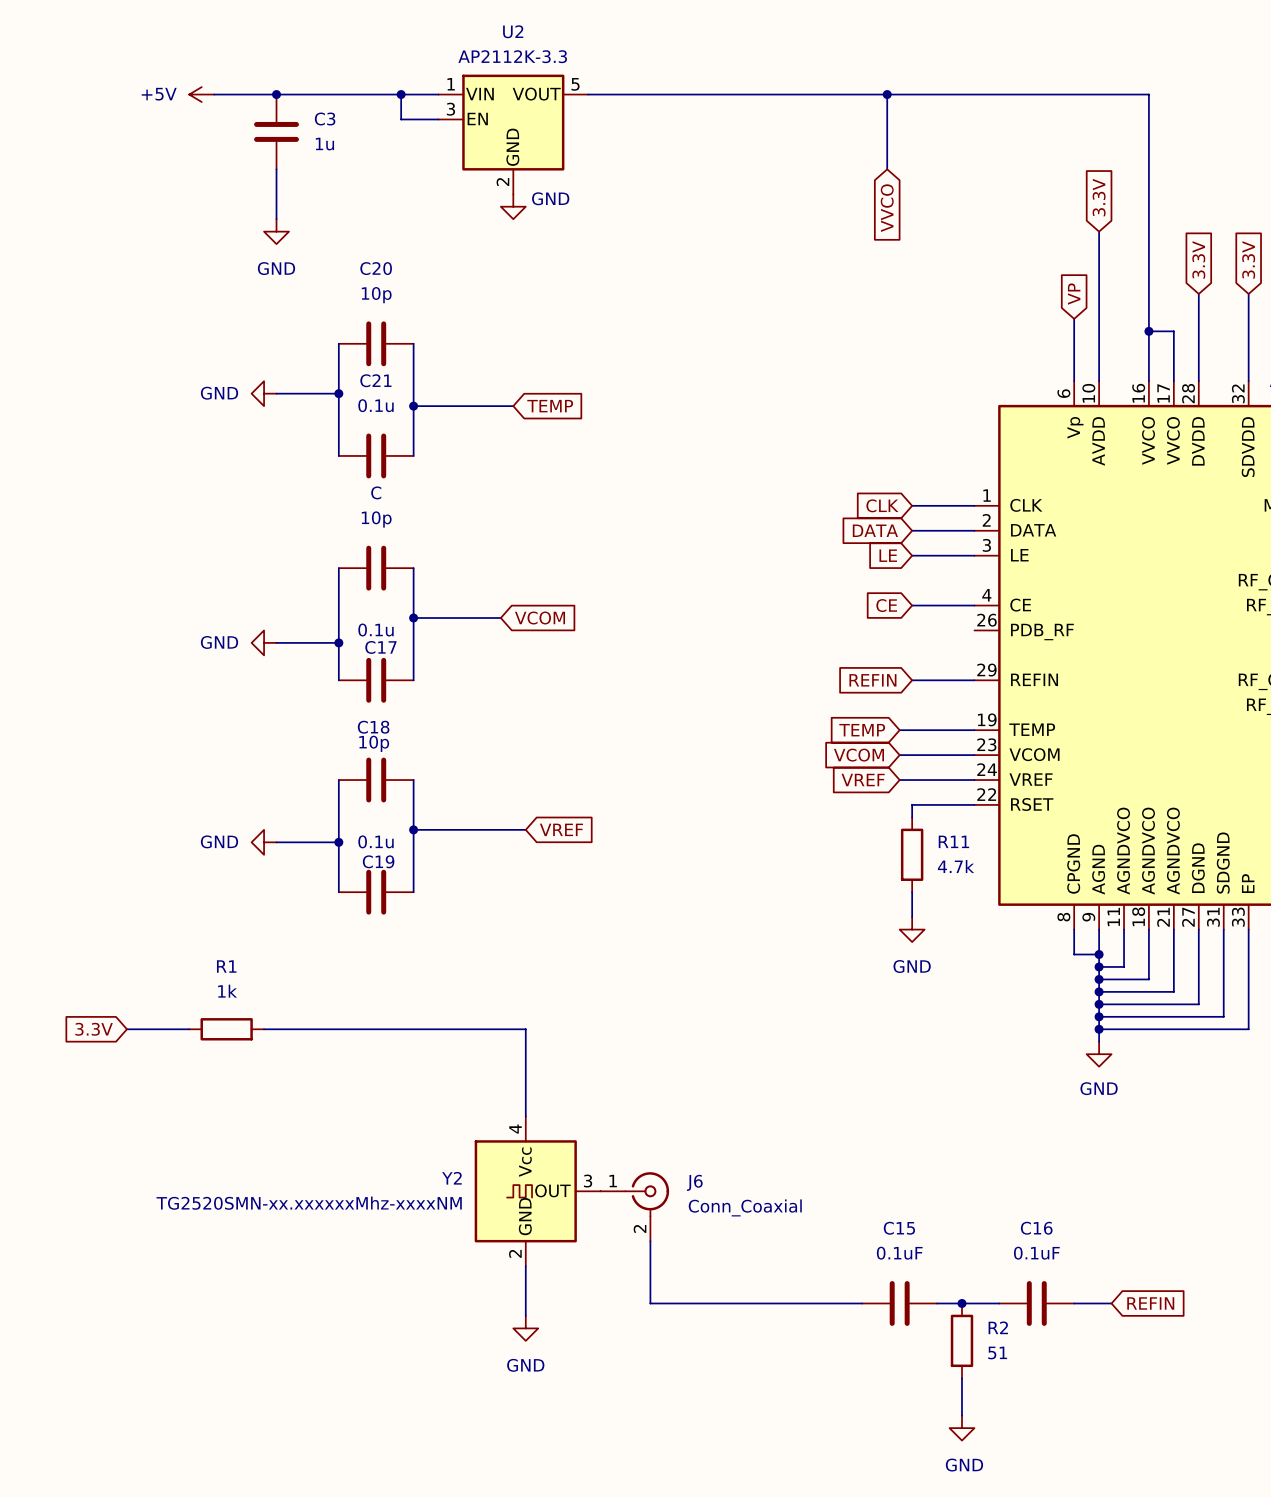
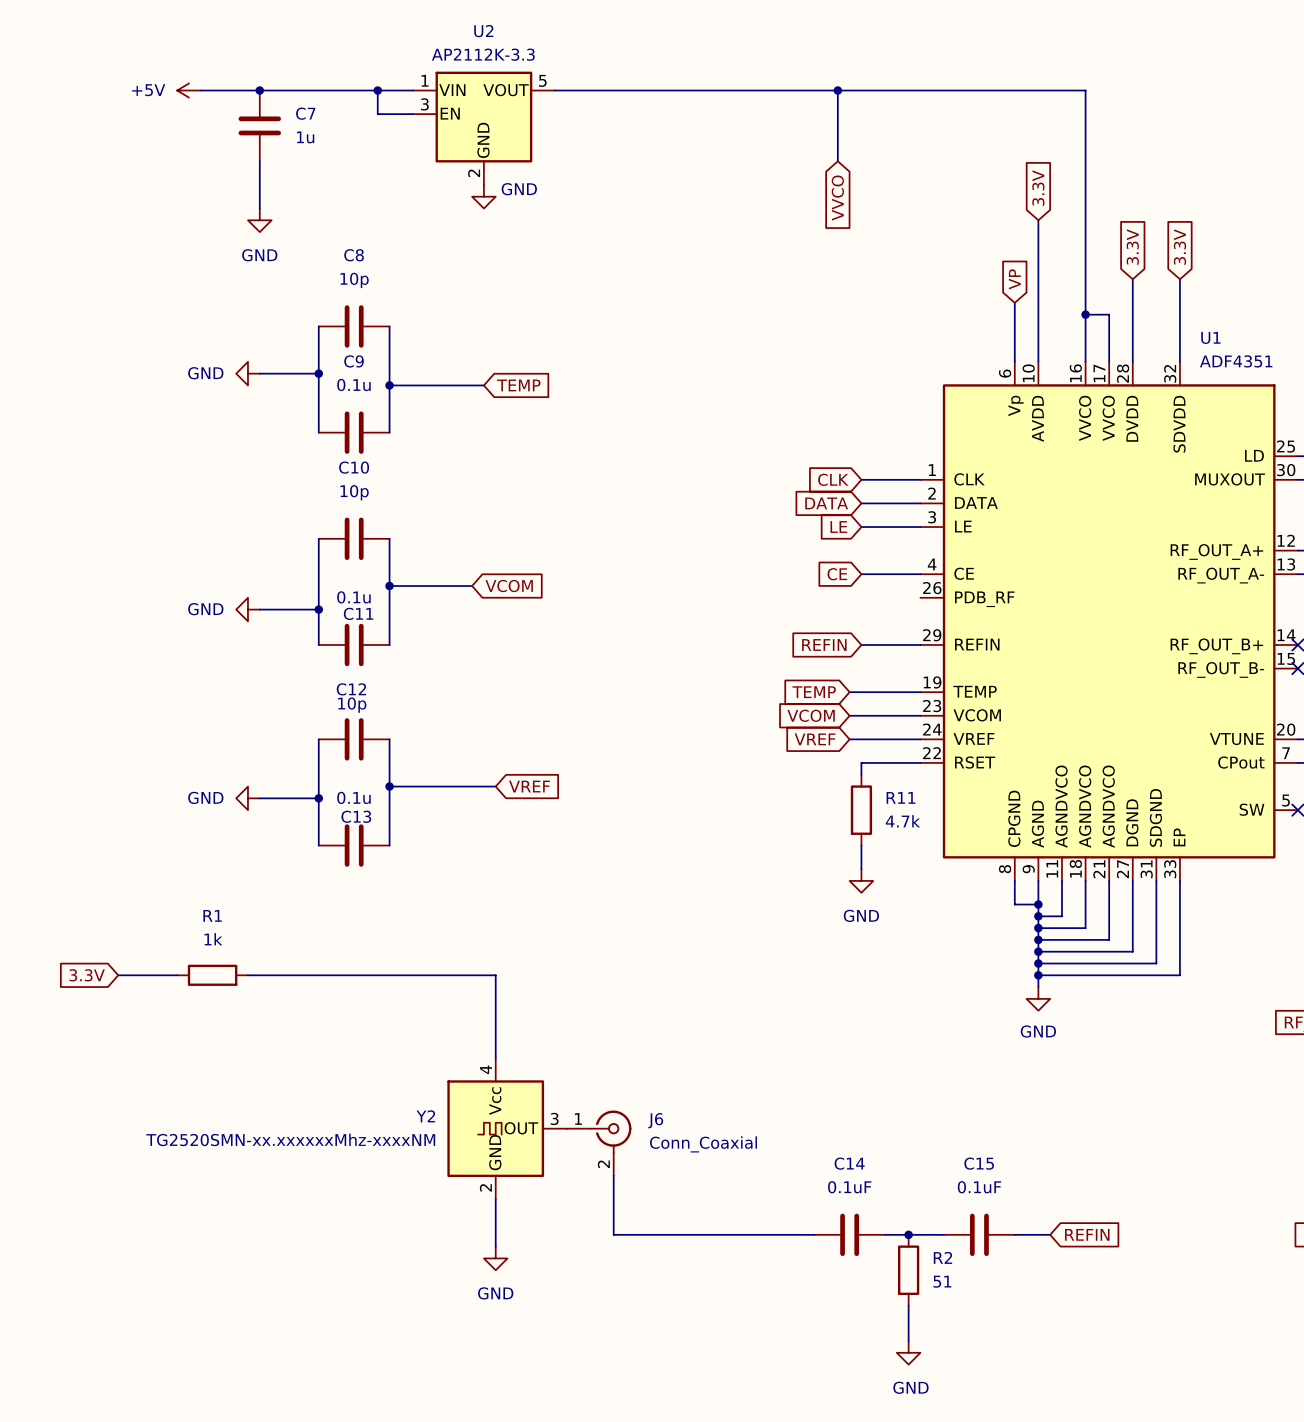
C3 name: C3 (325, 119) -> C7 (305, 113)
C20 name: C20 (376, 268) -> C8 (354, 255)
C21 name: C21 (375, 380) -> C9 (354, 361)
C name: C (376, 492) -> C10 (354, 467)
C17 name: C17 (380, 647) -> C11 (358, 613)
C18 name: C18 (373, 727) -> C12 (351, 689)
C19 name: C19 (378, 861) -> C13 (356, 816)
C15 name: C15 (899, 1228) -> C14 (849, 1163)
C16 name: C16 (1036, 1228) -> C15 (979, 1163)

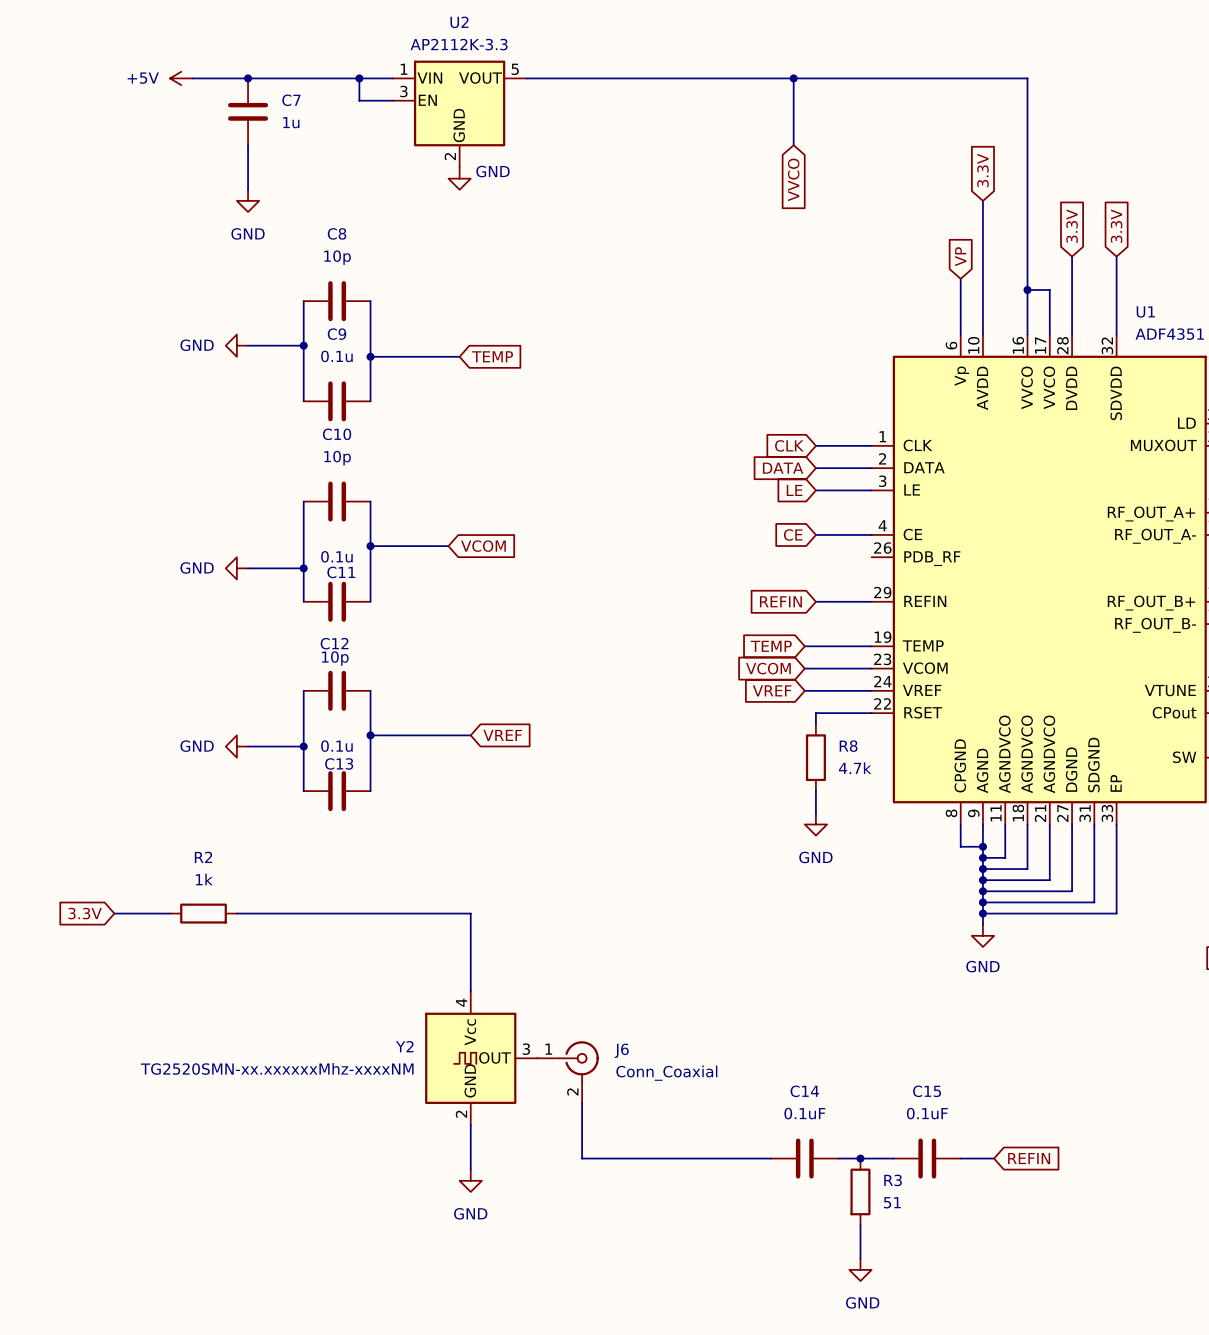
R11 name: R11 (900, 797) -> R8 (848, 746)
R1 name: R1 (212, 915) -> R2 (203, 857)
R2 name: R2 (942, 1257) -> R3 (893, 1180)

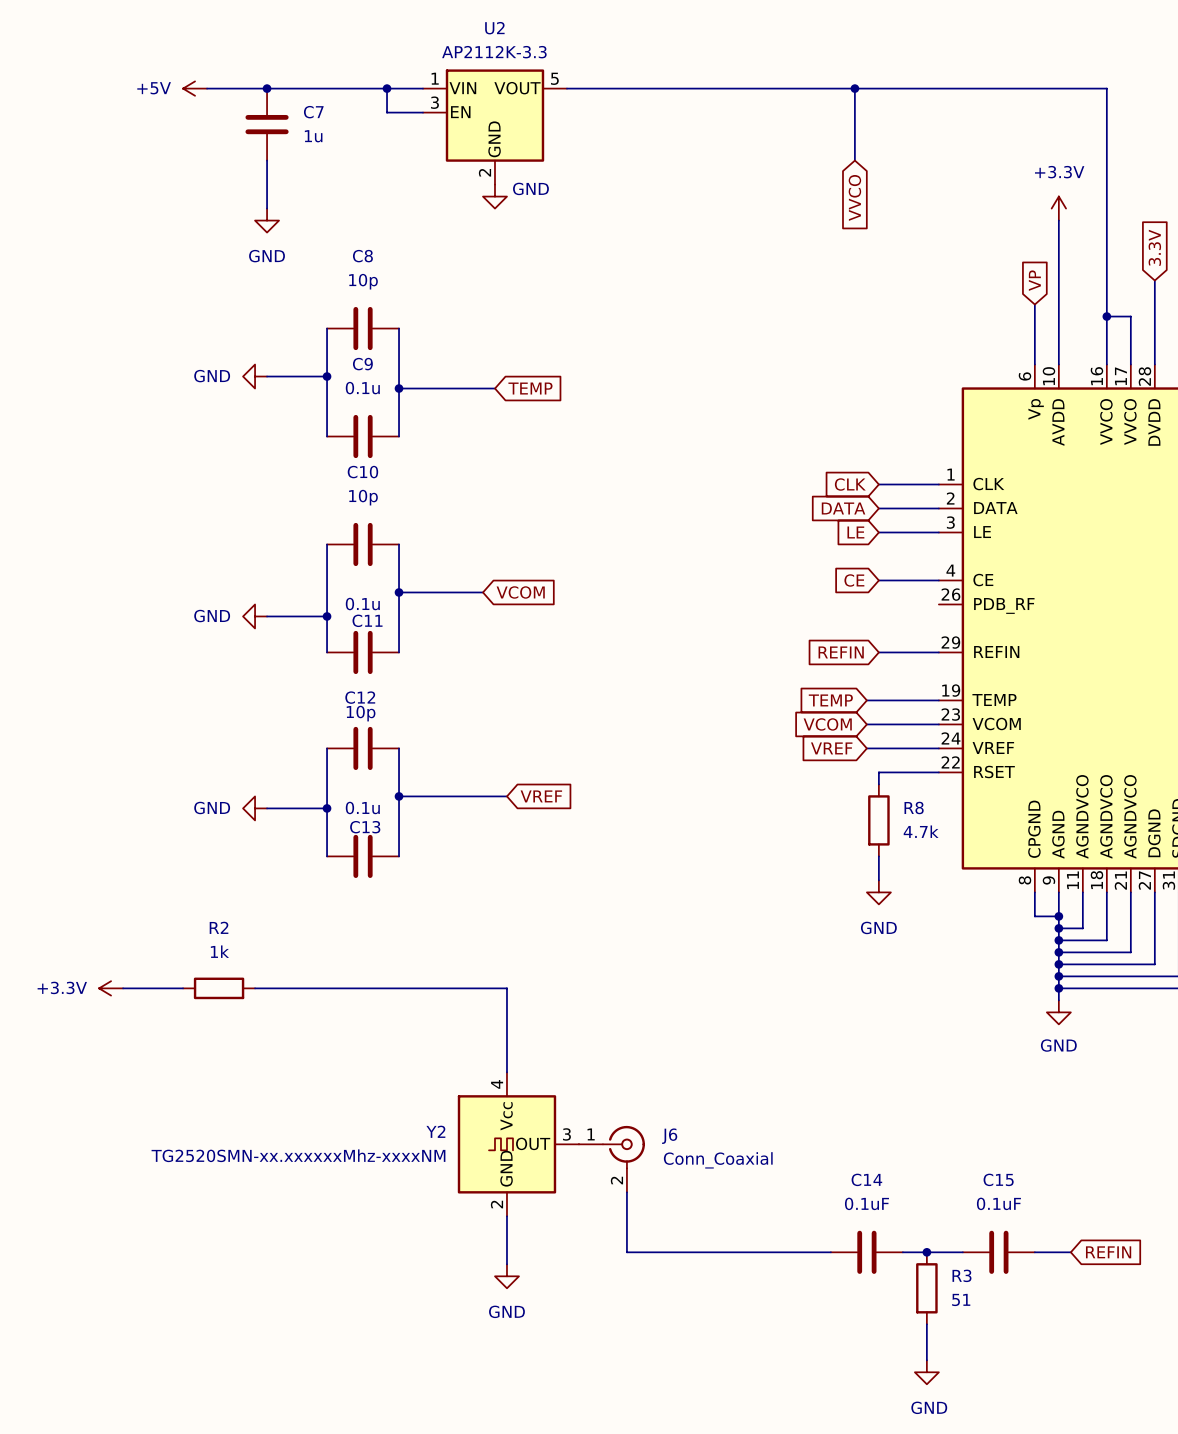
global label: 3.3V (982, 170) -> none
power symbol: none -> +3.3V (1058, 208)
global label: 3.3V (85, 913) -> none
power symbol: none -> +3.3V (111, 988)

